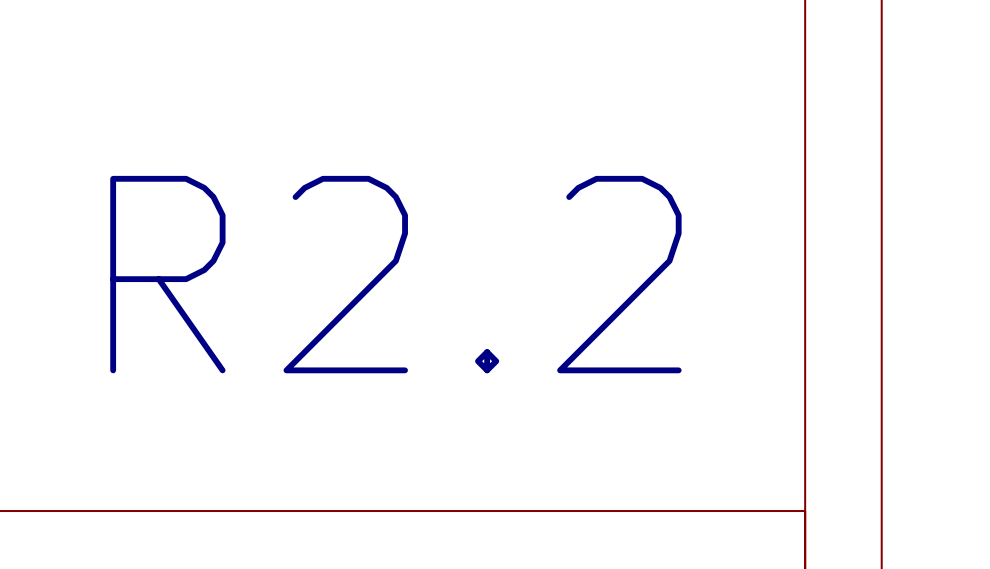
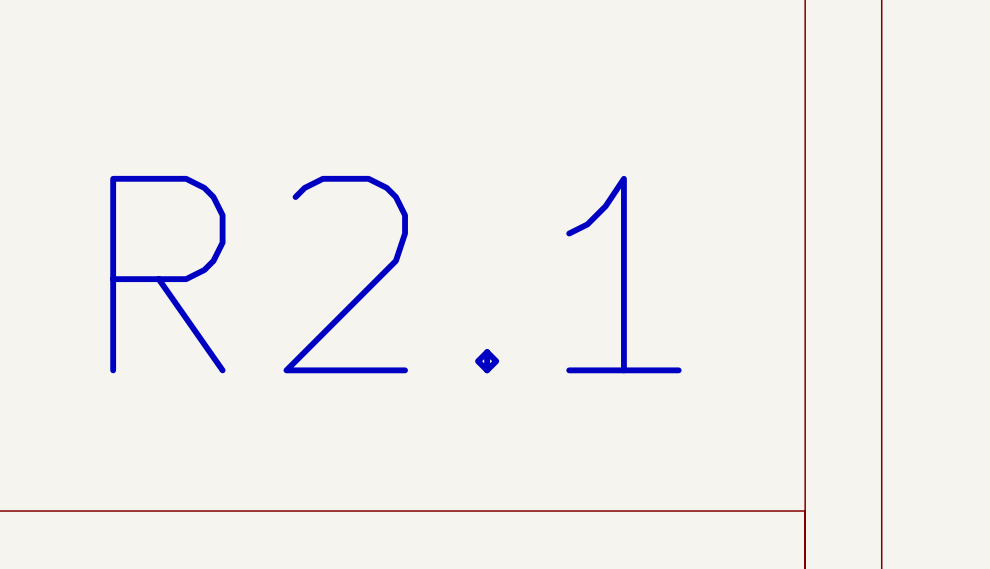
text: R2.2 (395, 274) -> R2.1 (395, 274)

